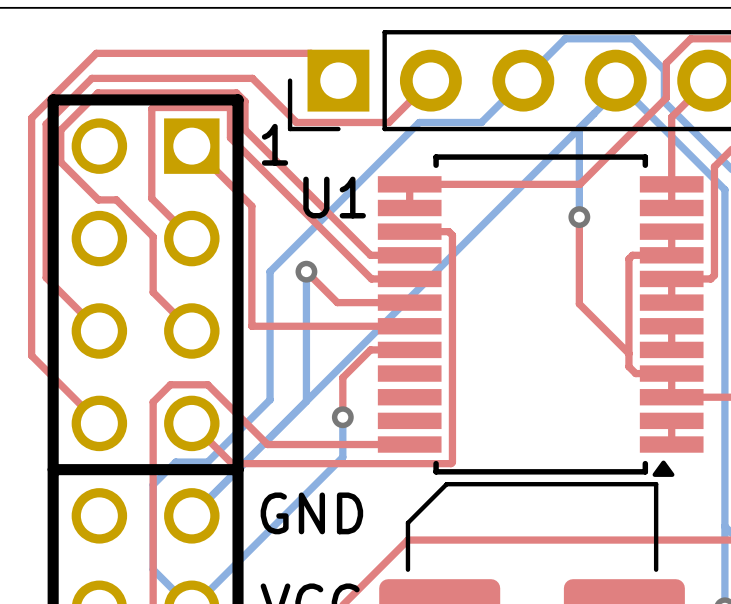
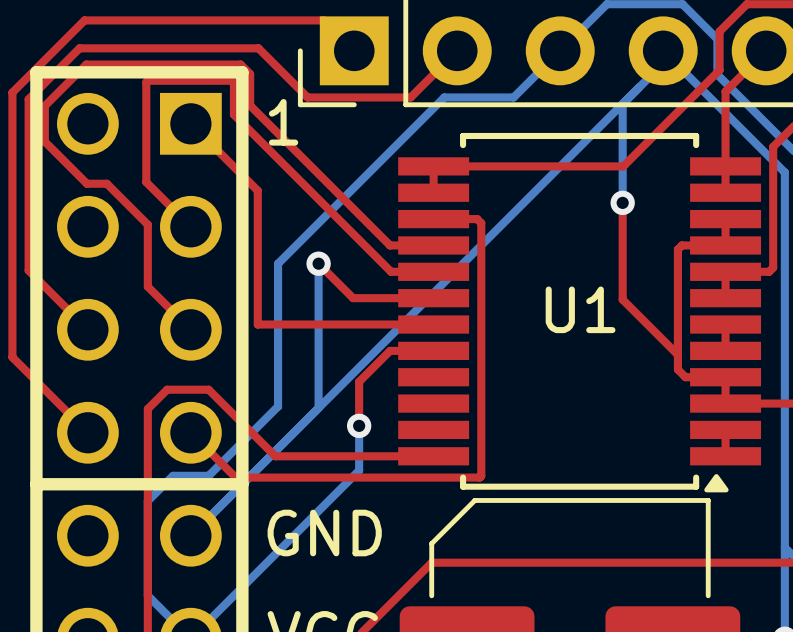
U1 name position: U1 (334, 197) -> U1 (580, 309)

